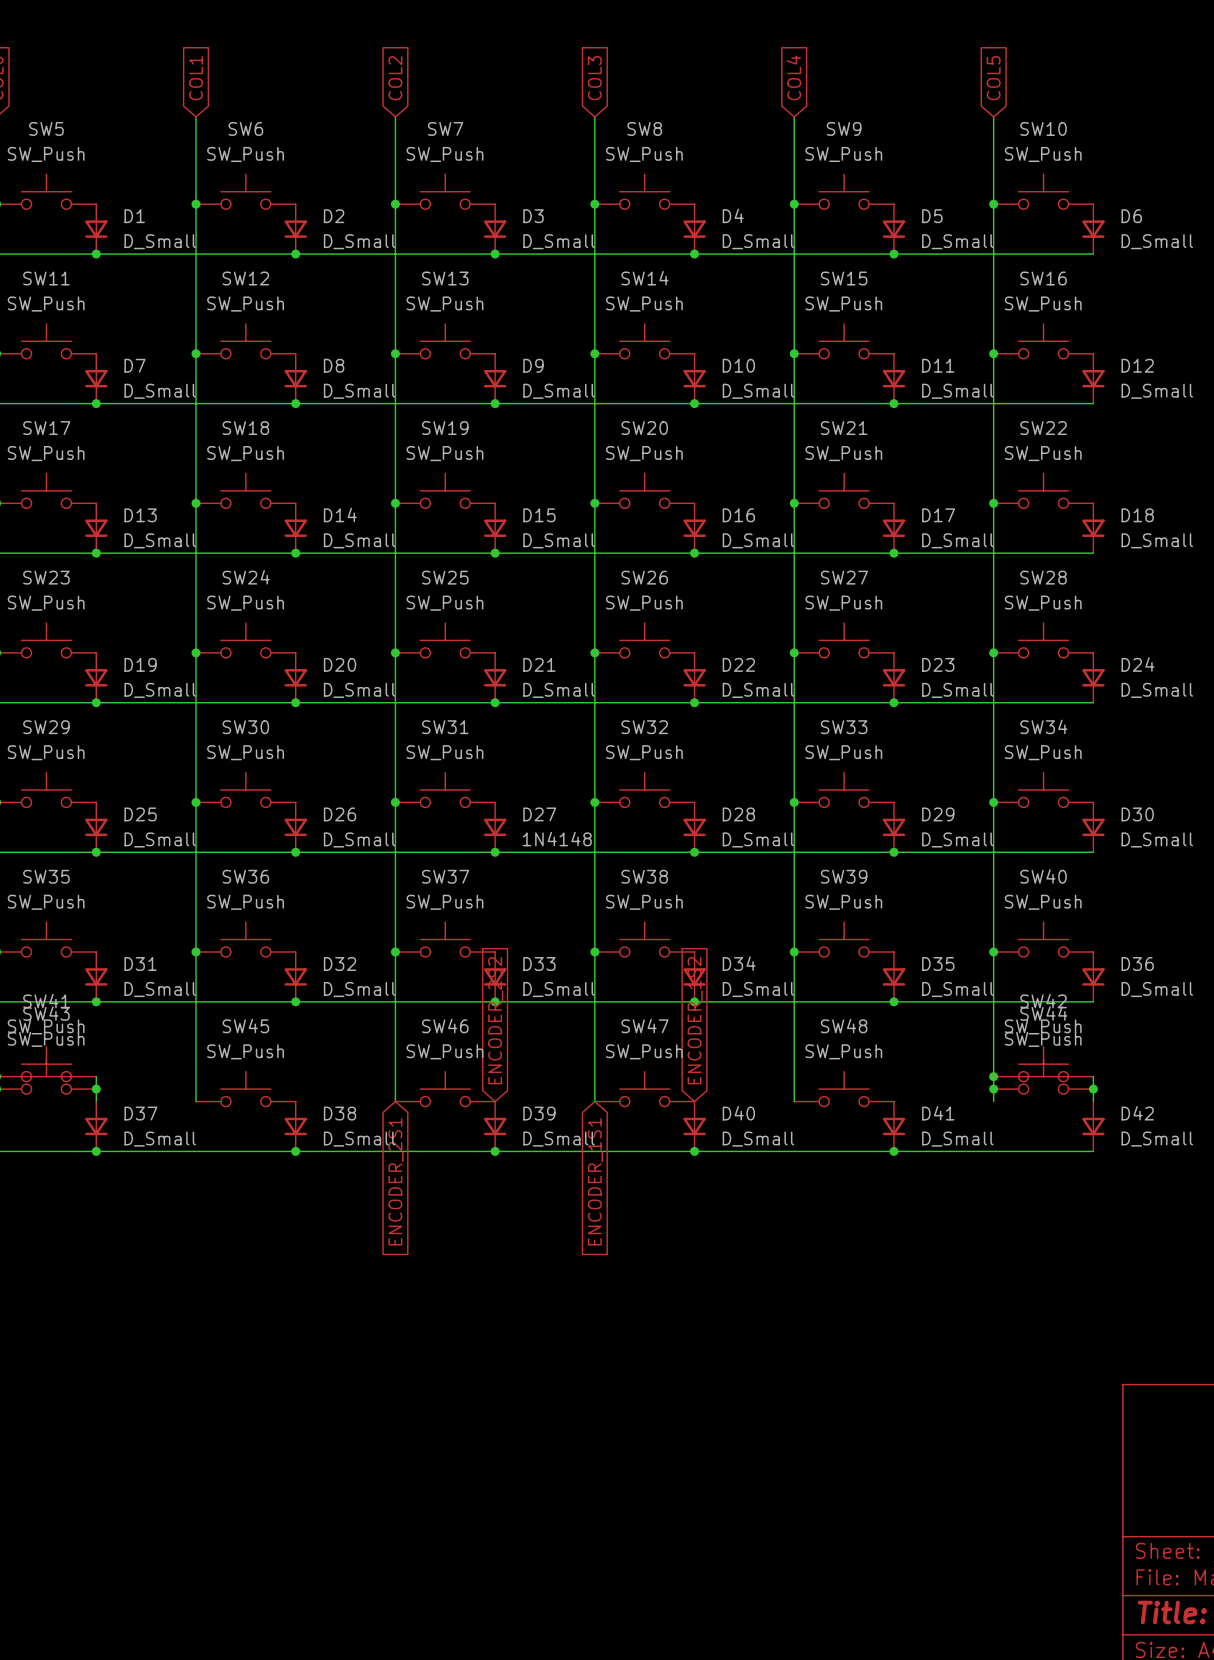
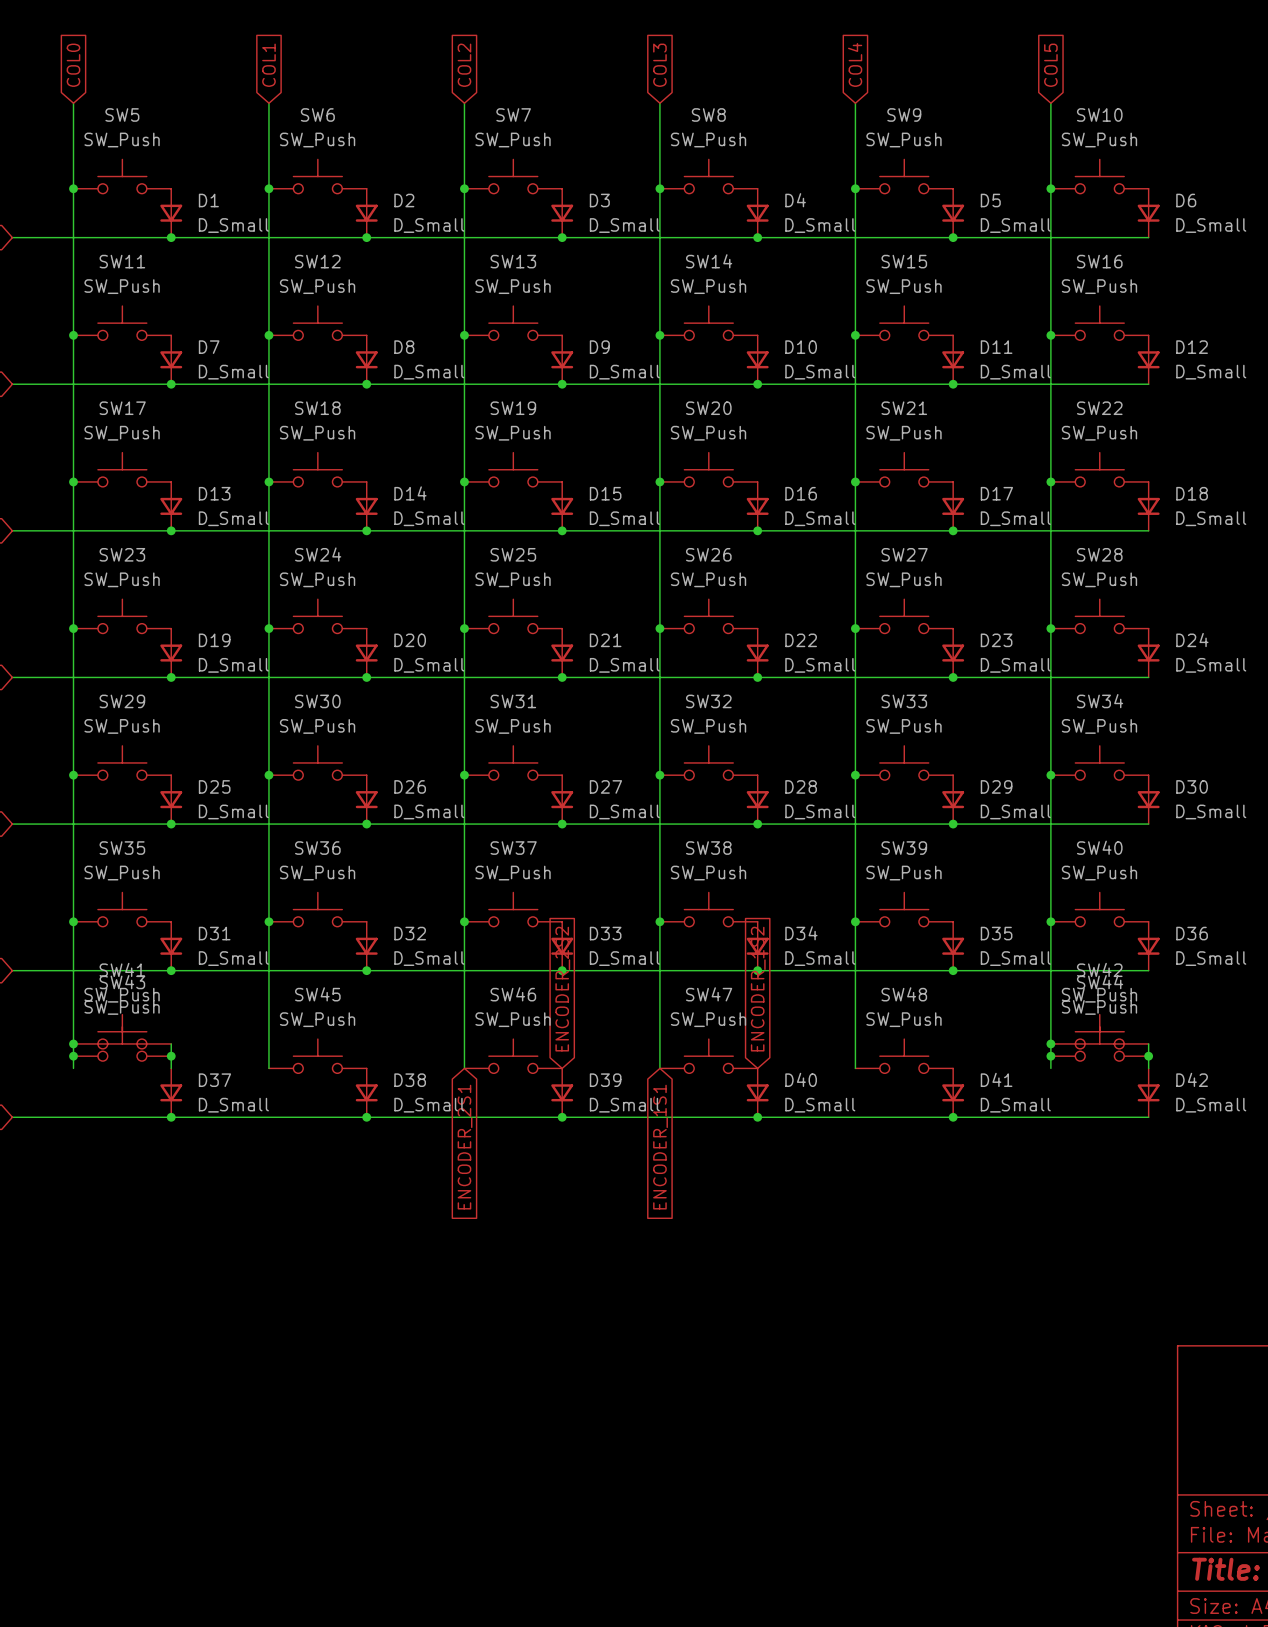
D27 value: 1N4148 (557, 839) -> D_Small (624, 811)

